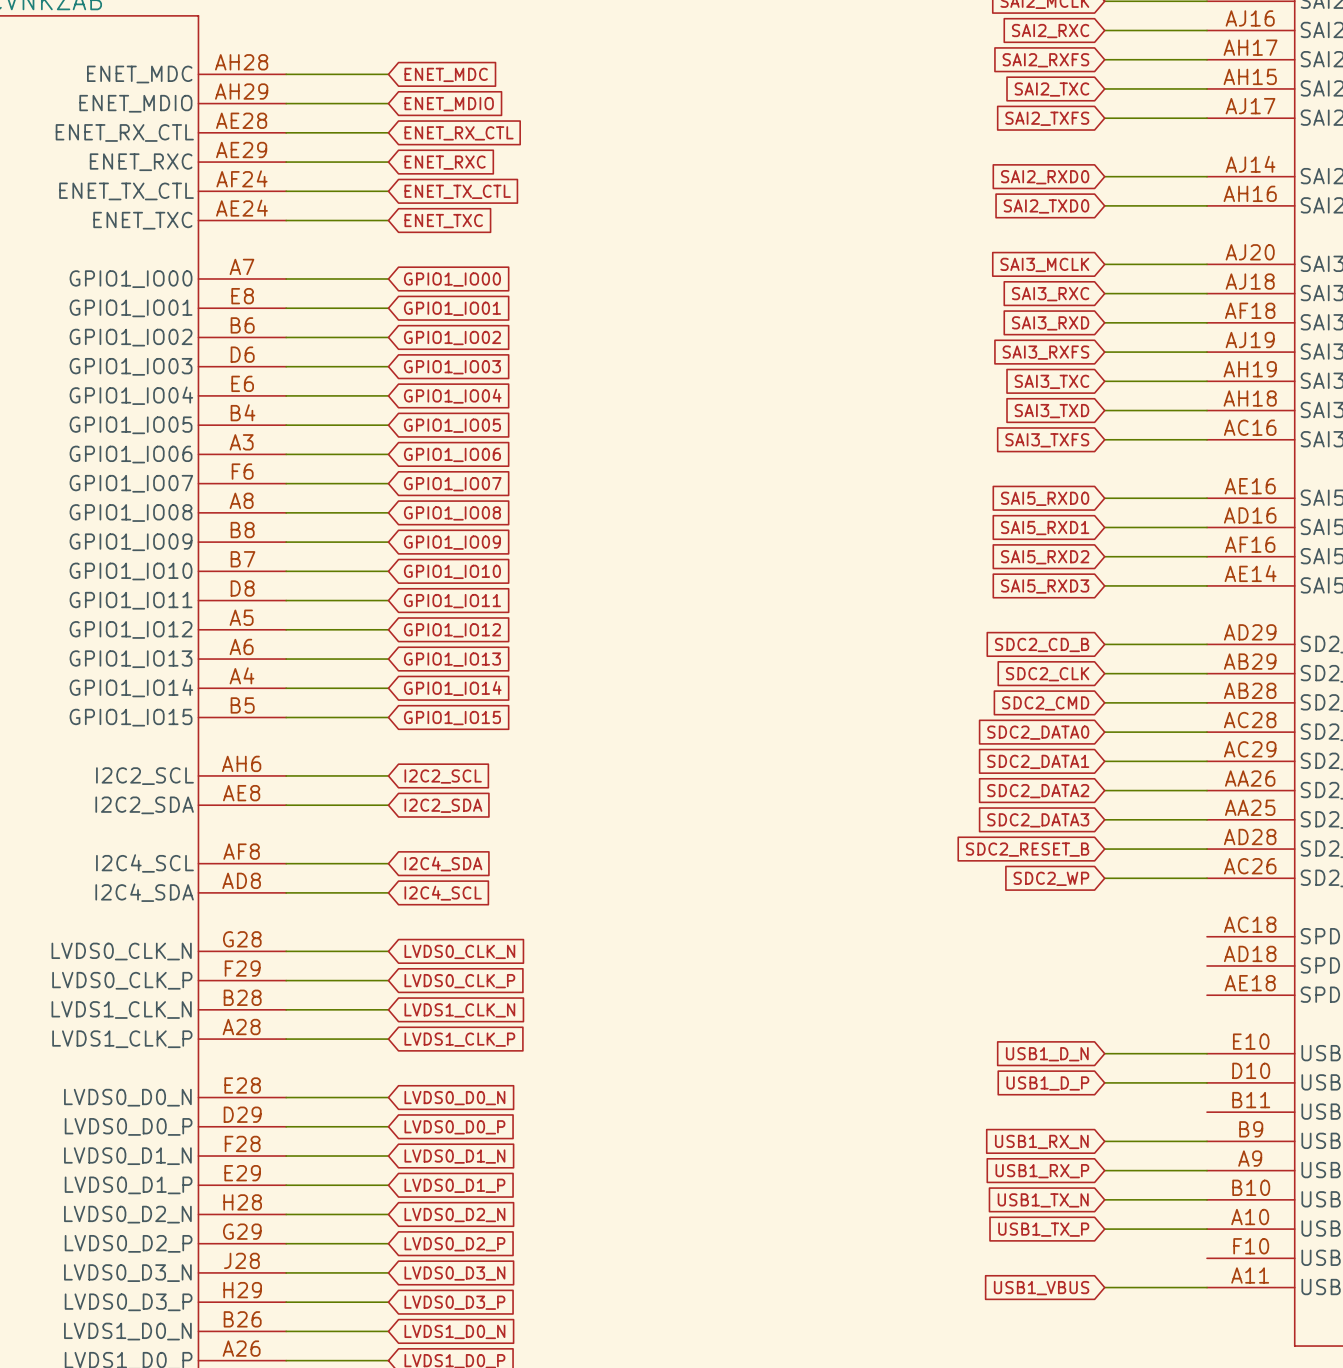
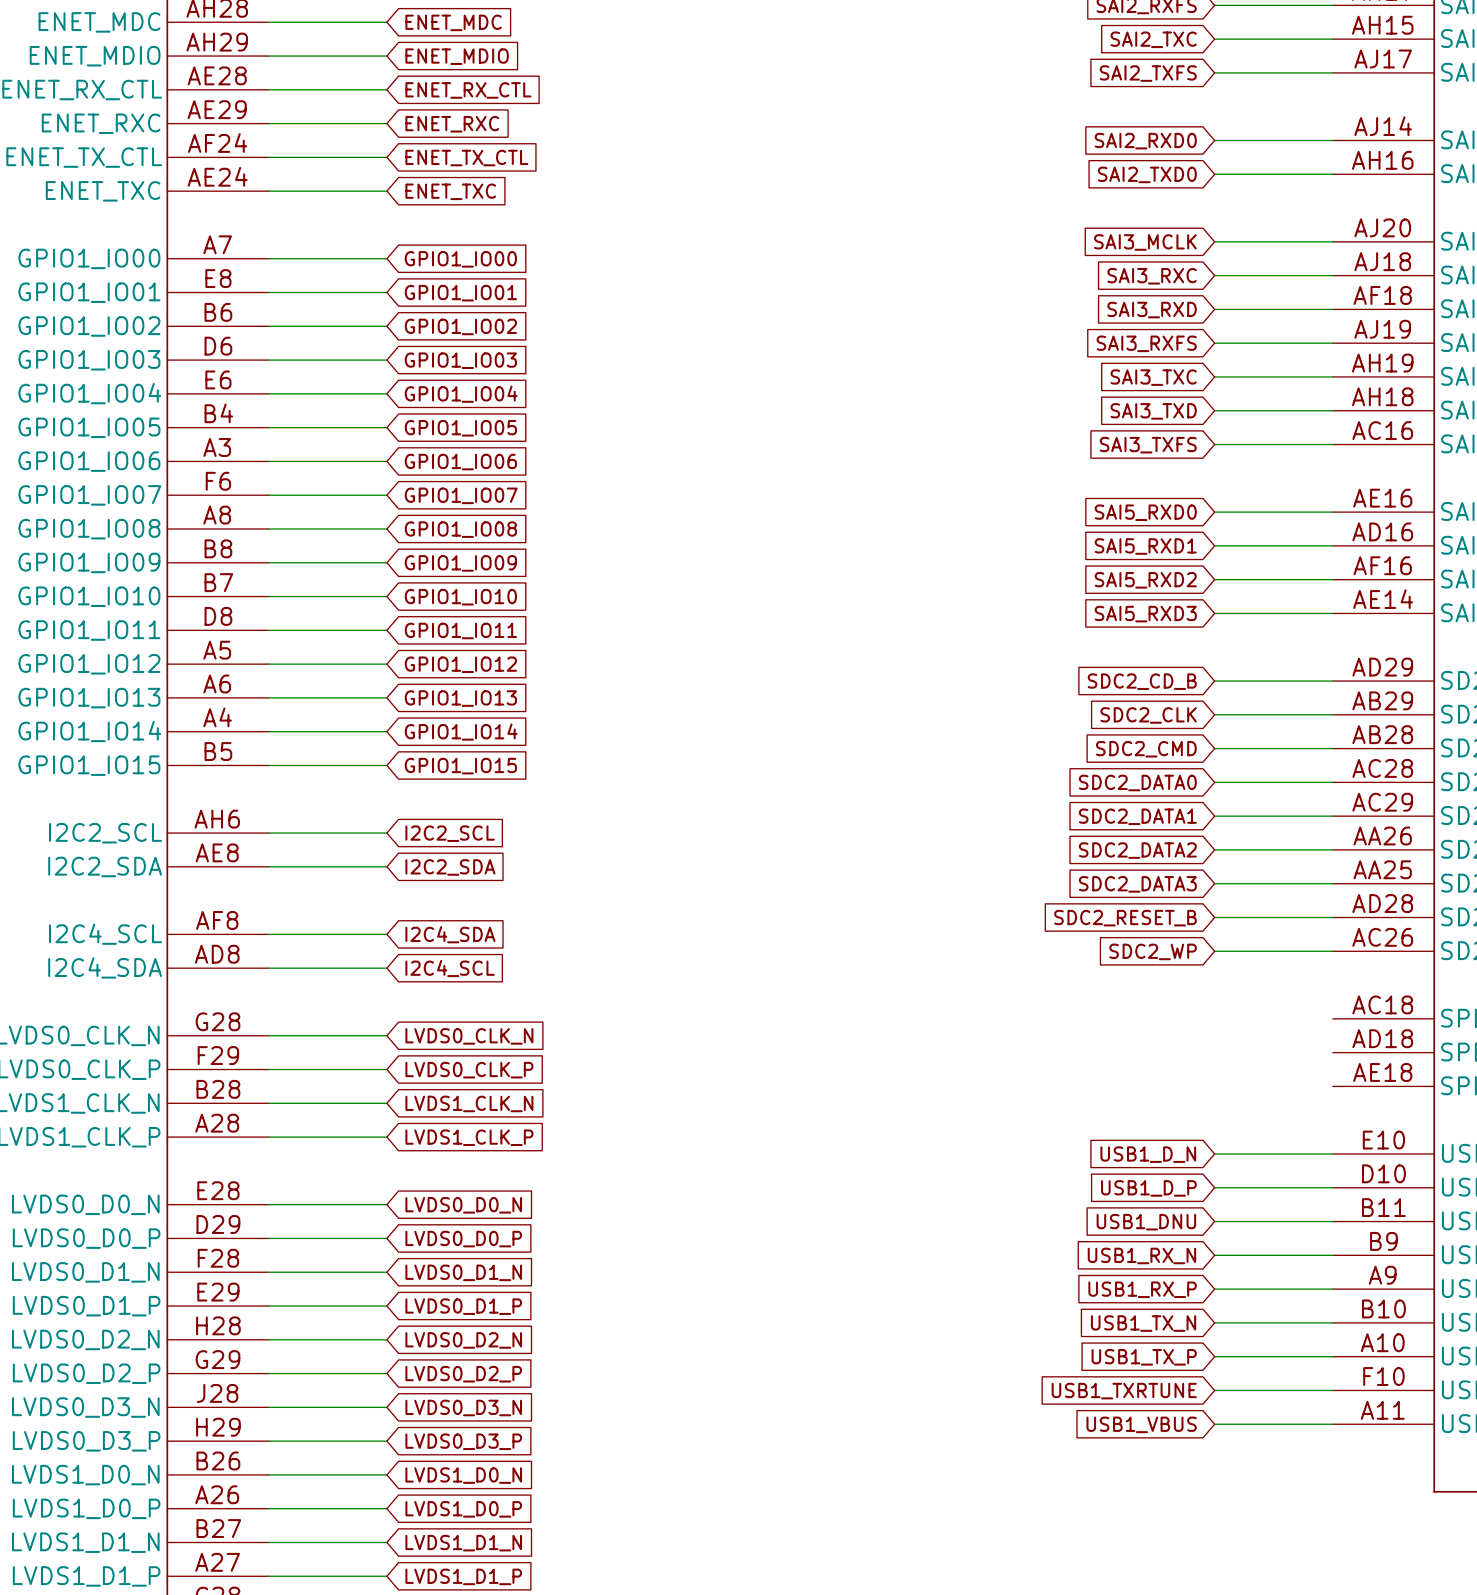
global label: none -> USB1_DNU (1146, 1222)
wire: none -> (1214, 1221) (1332, 1221)
global label: none -> USB1_TXRTUNE (1124, 1391)
wire: none -> (1214, 1390) (1332, 1390)

